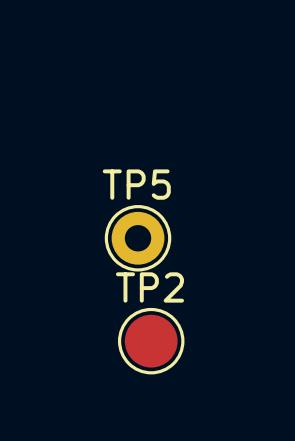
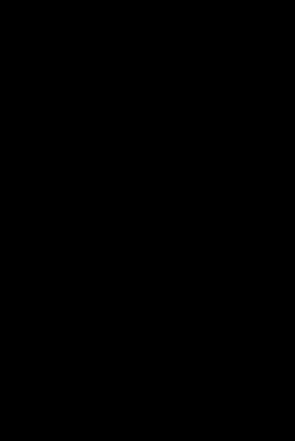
TP5: (138, 238) -> none
TP2: (151, 341) -> none

